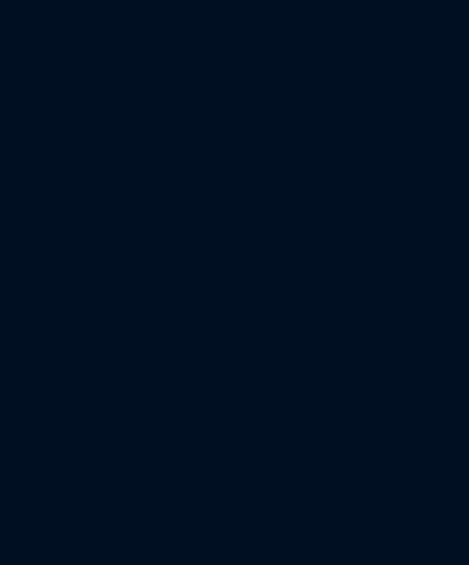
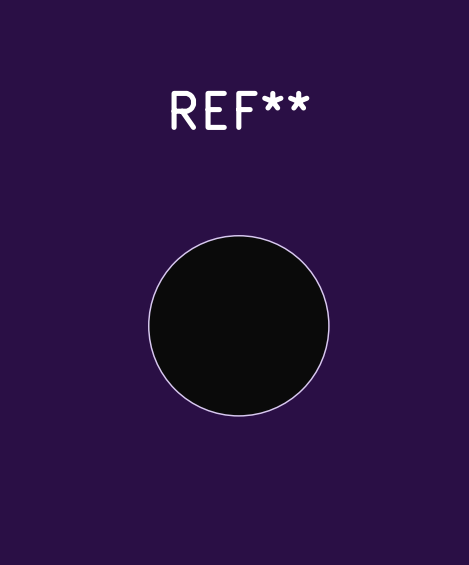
REF**: none -> (238, 325)

